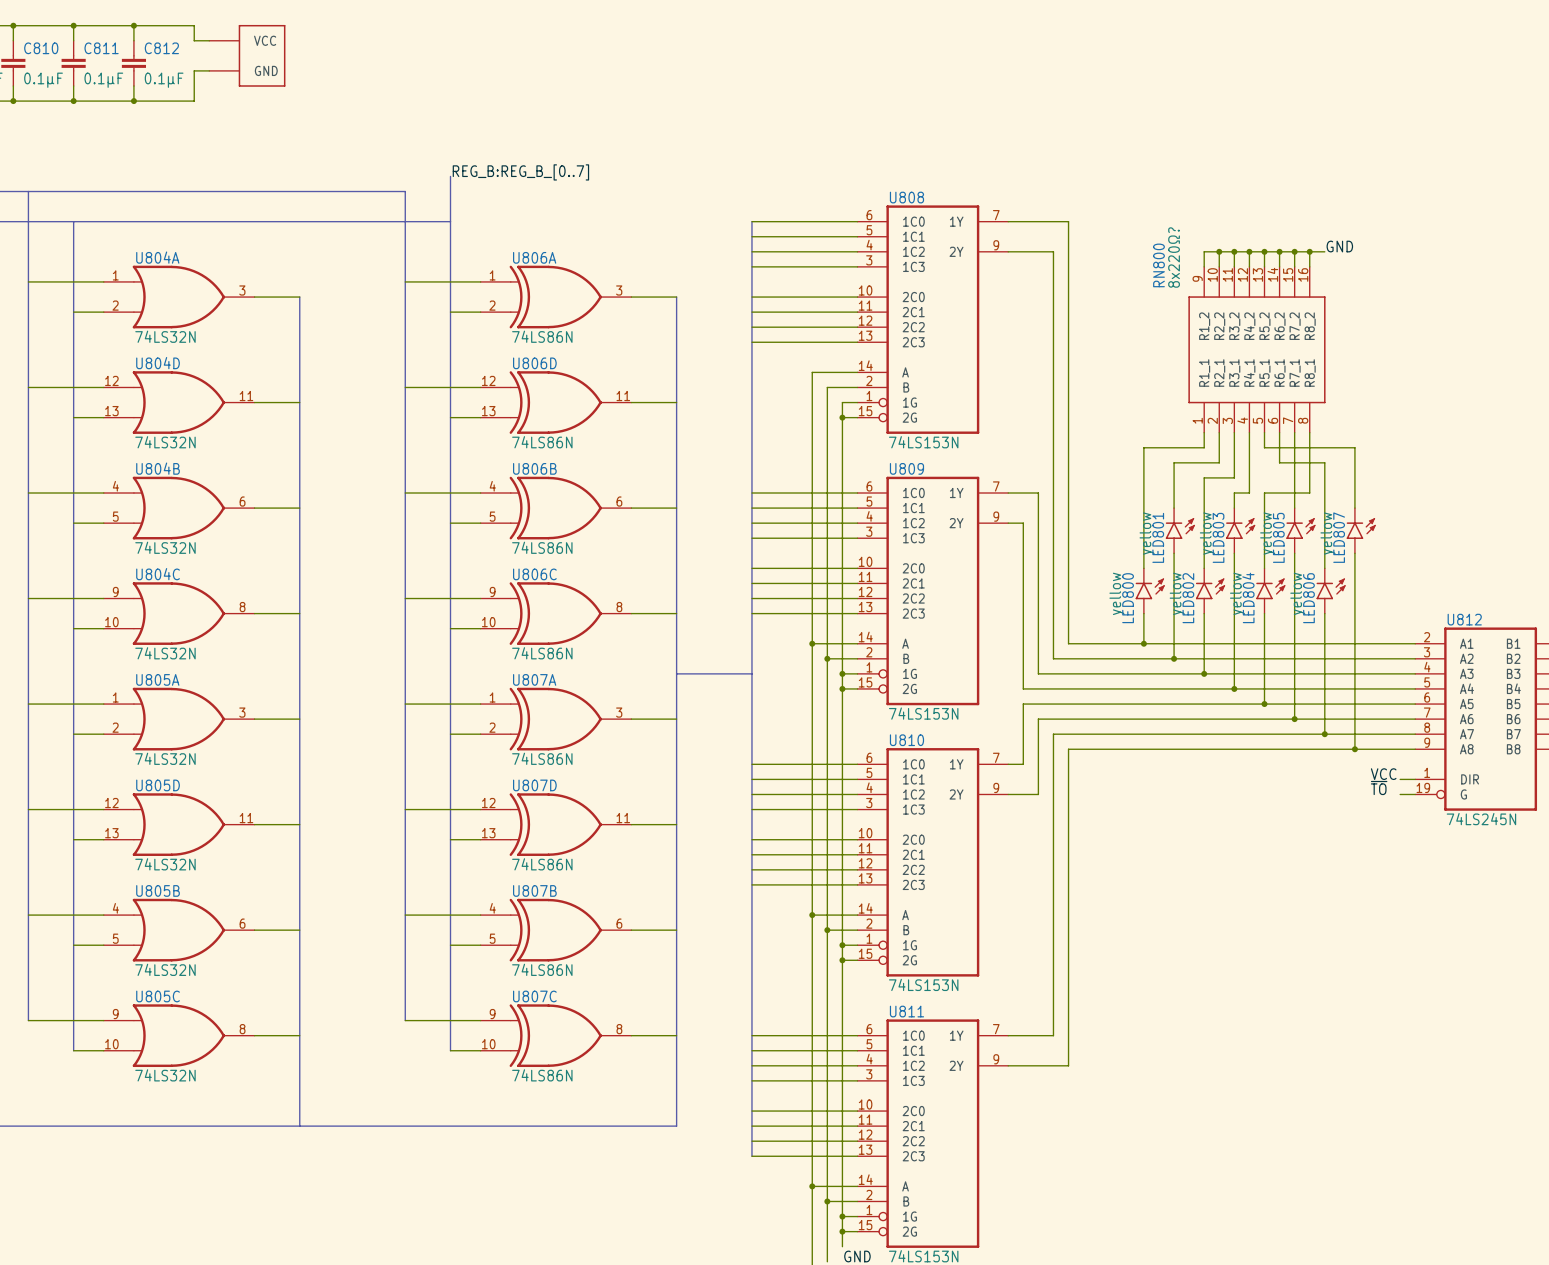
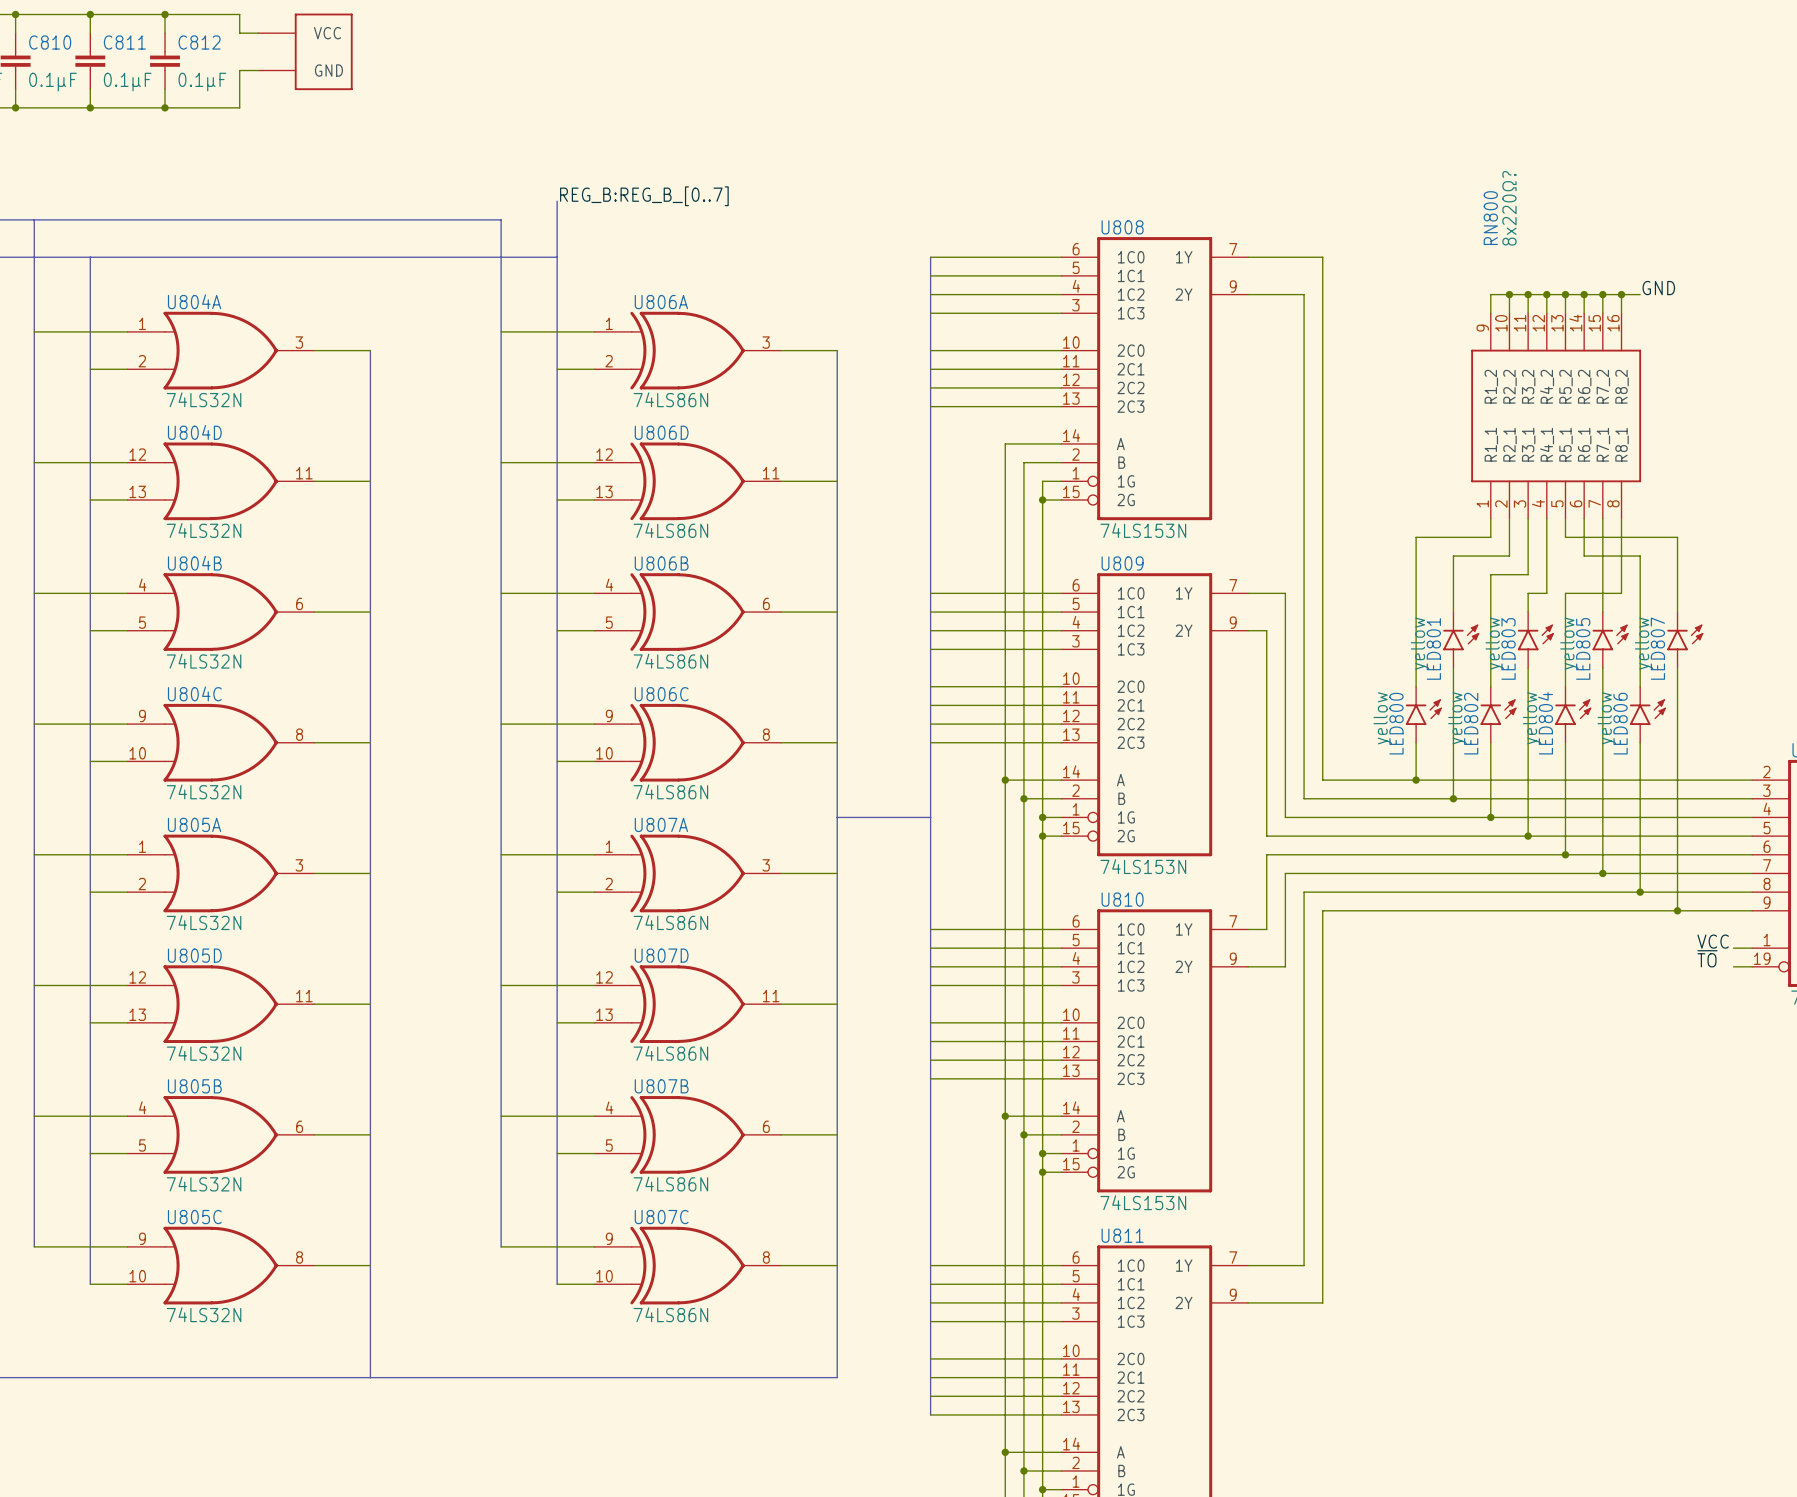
RN800 value position: 8x220Ω? (1174, 257) -> 8x220Ω? (1509, 208)
RN800 name position: RN800 (1158, 265) -> RN800 (1490, 218)

